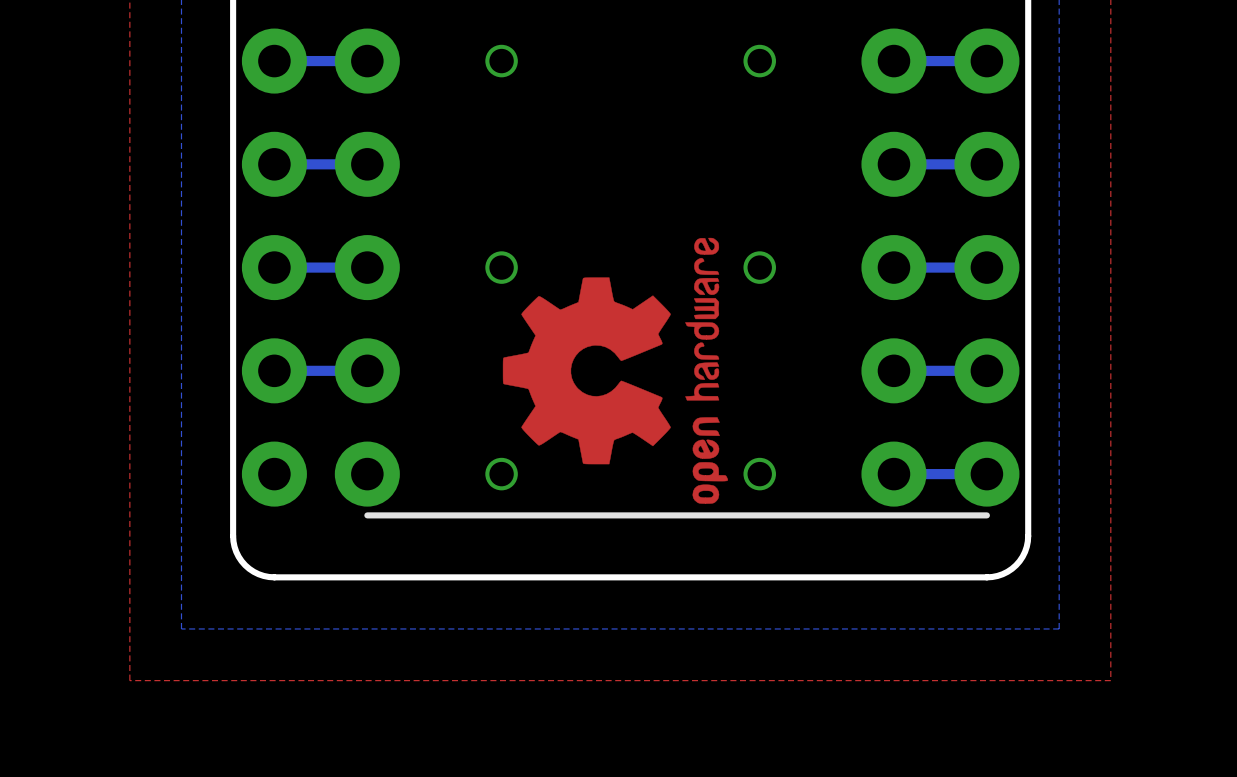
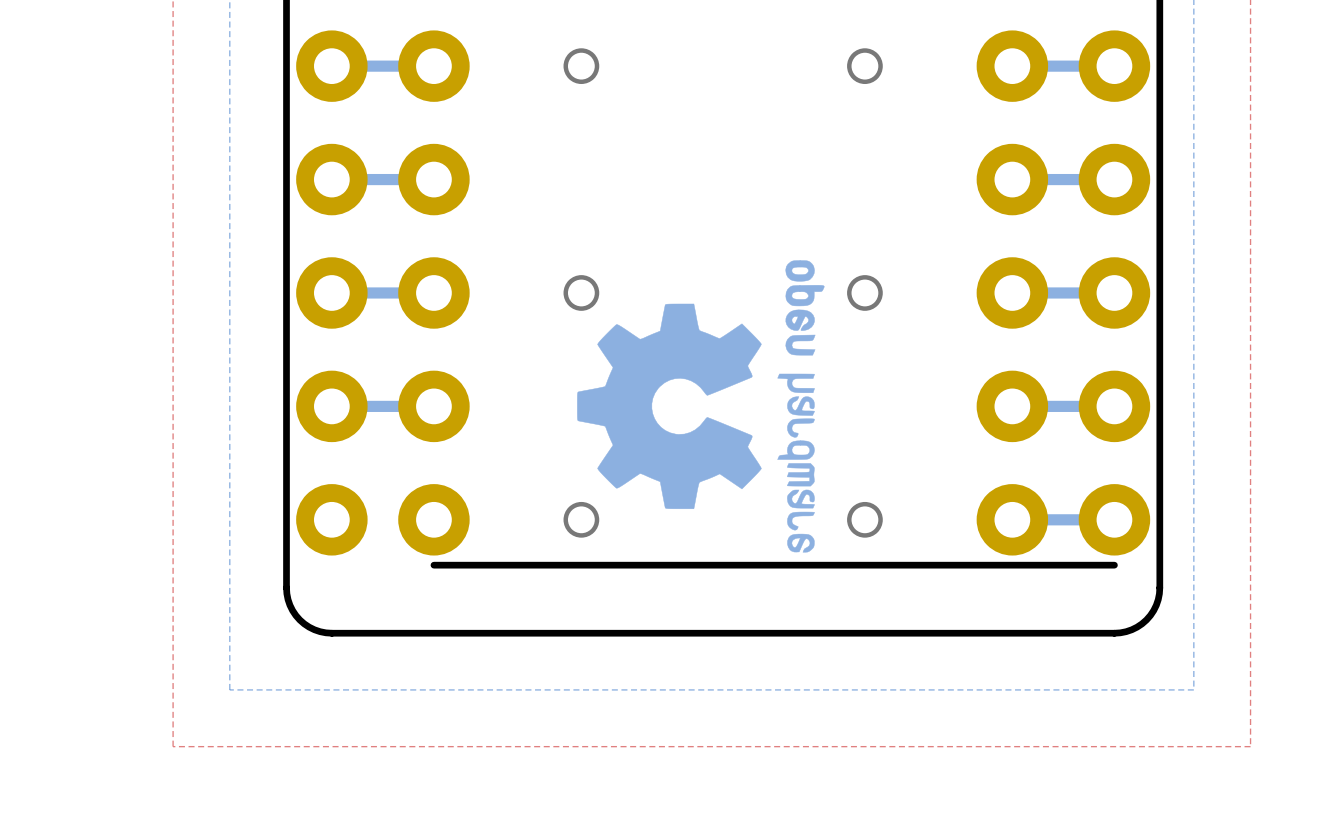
drawing shape: [502, 237, 729, 504] -> [577, 260, 825, 553]

